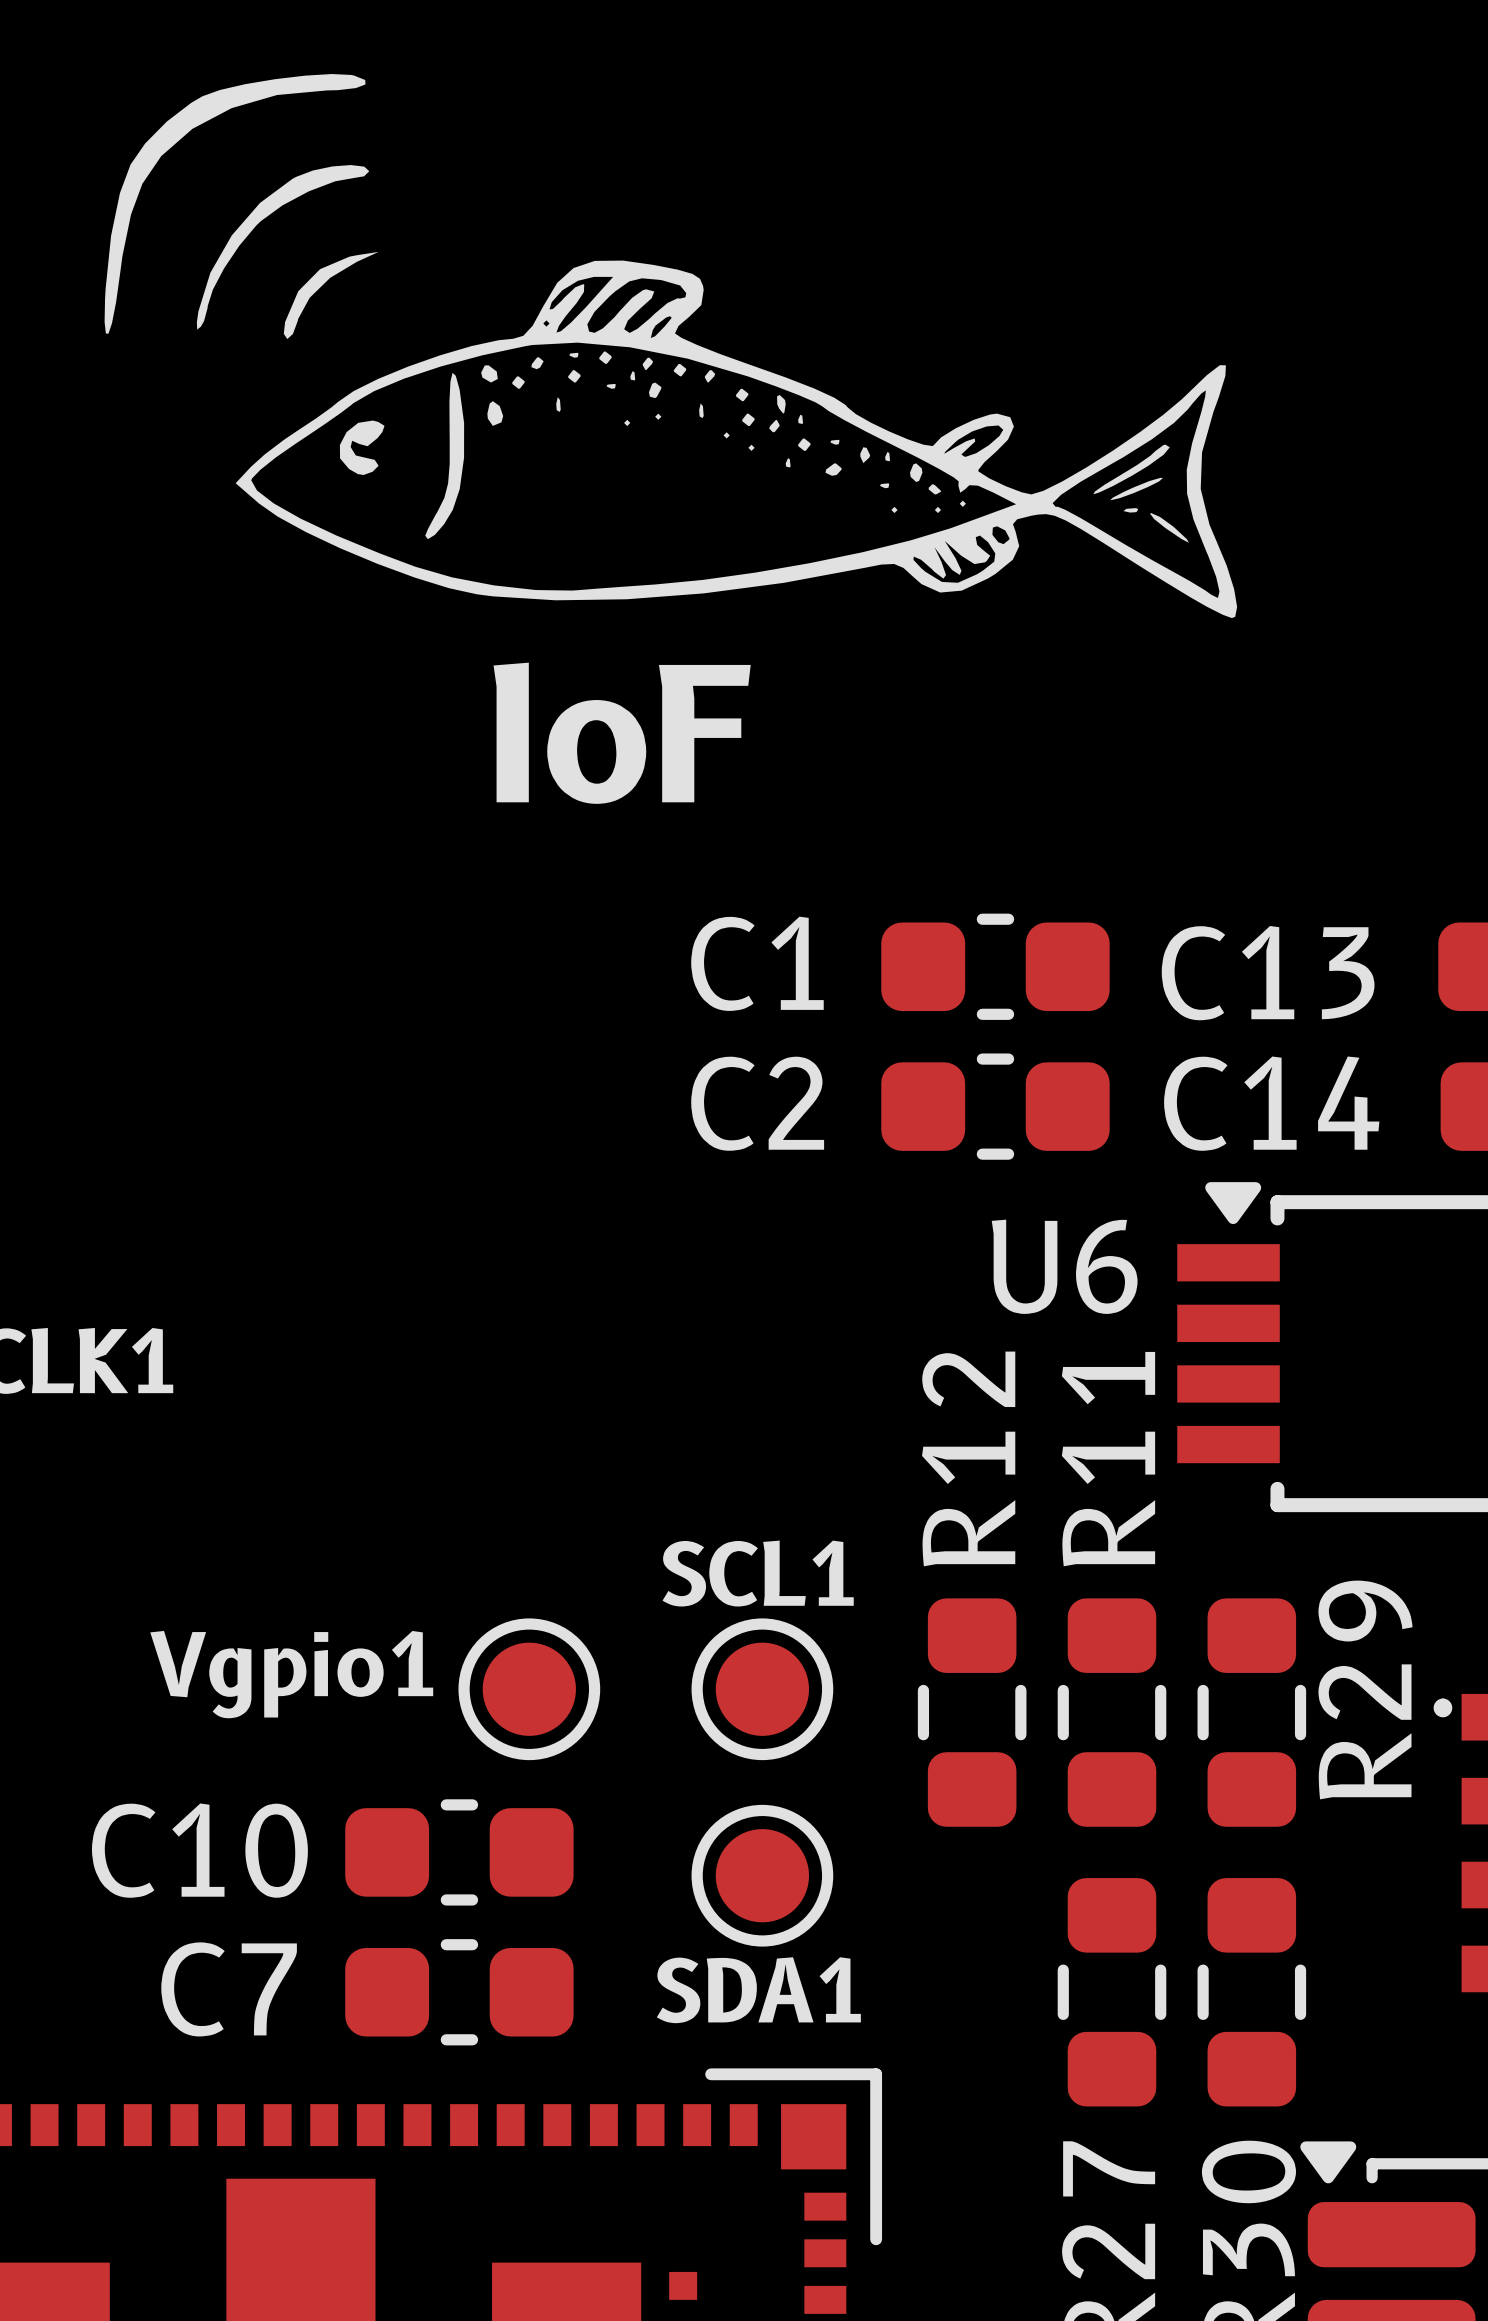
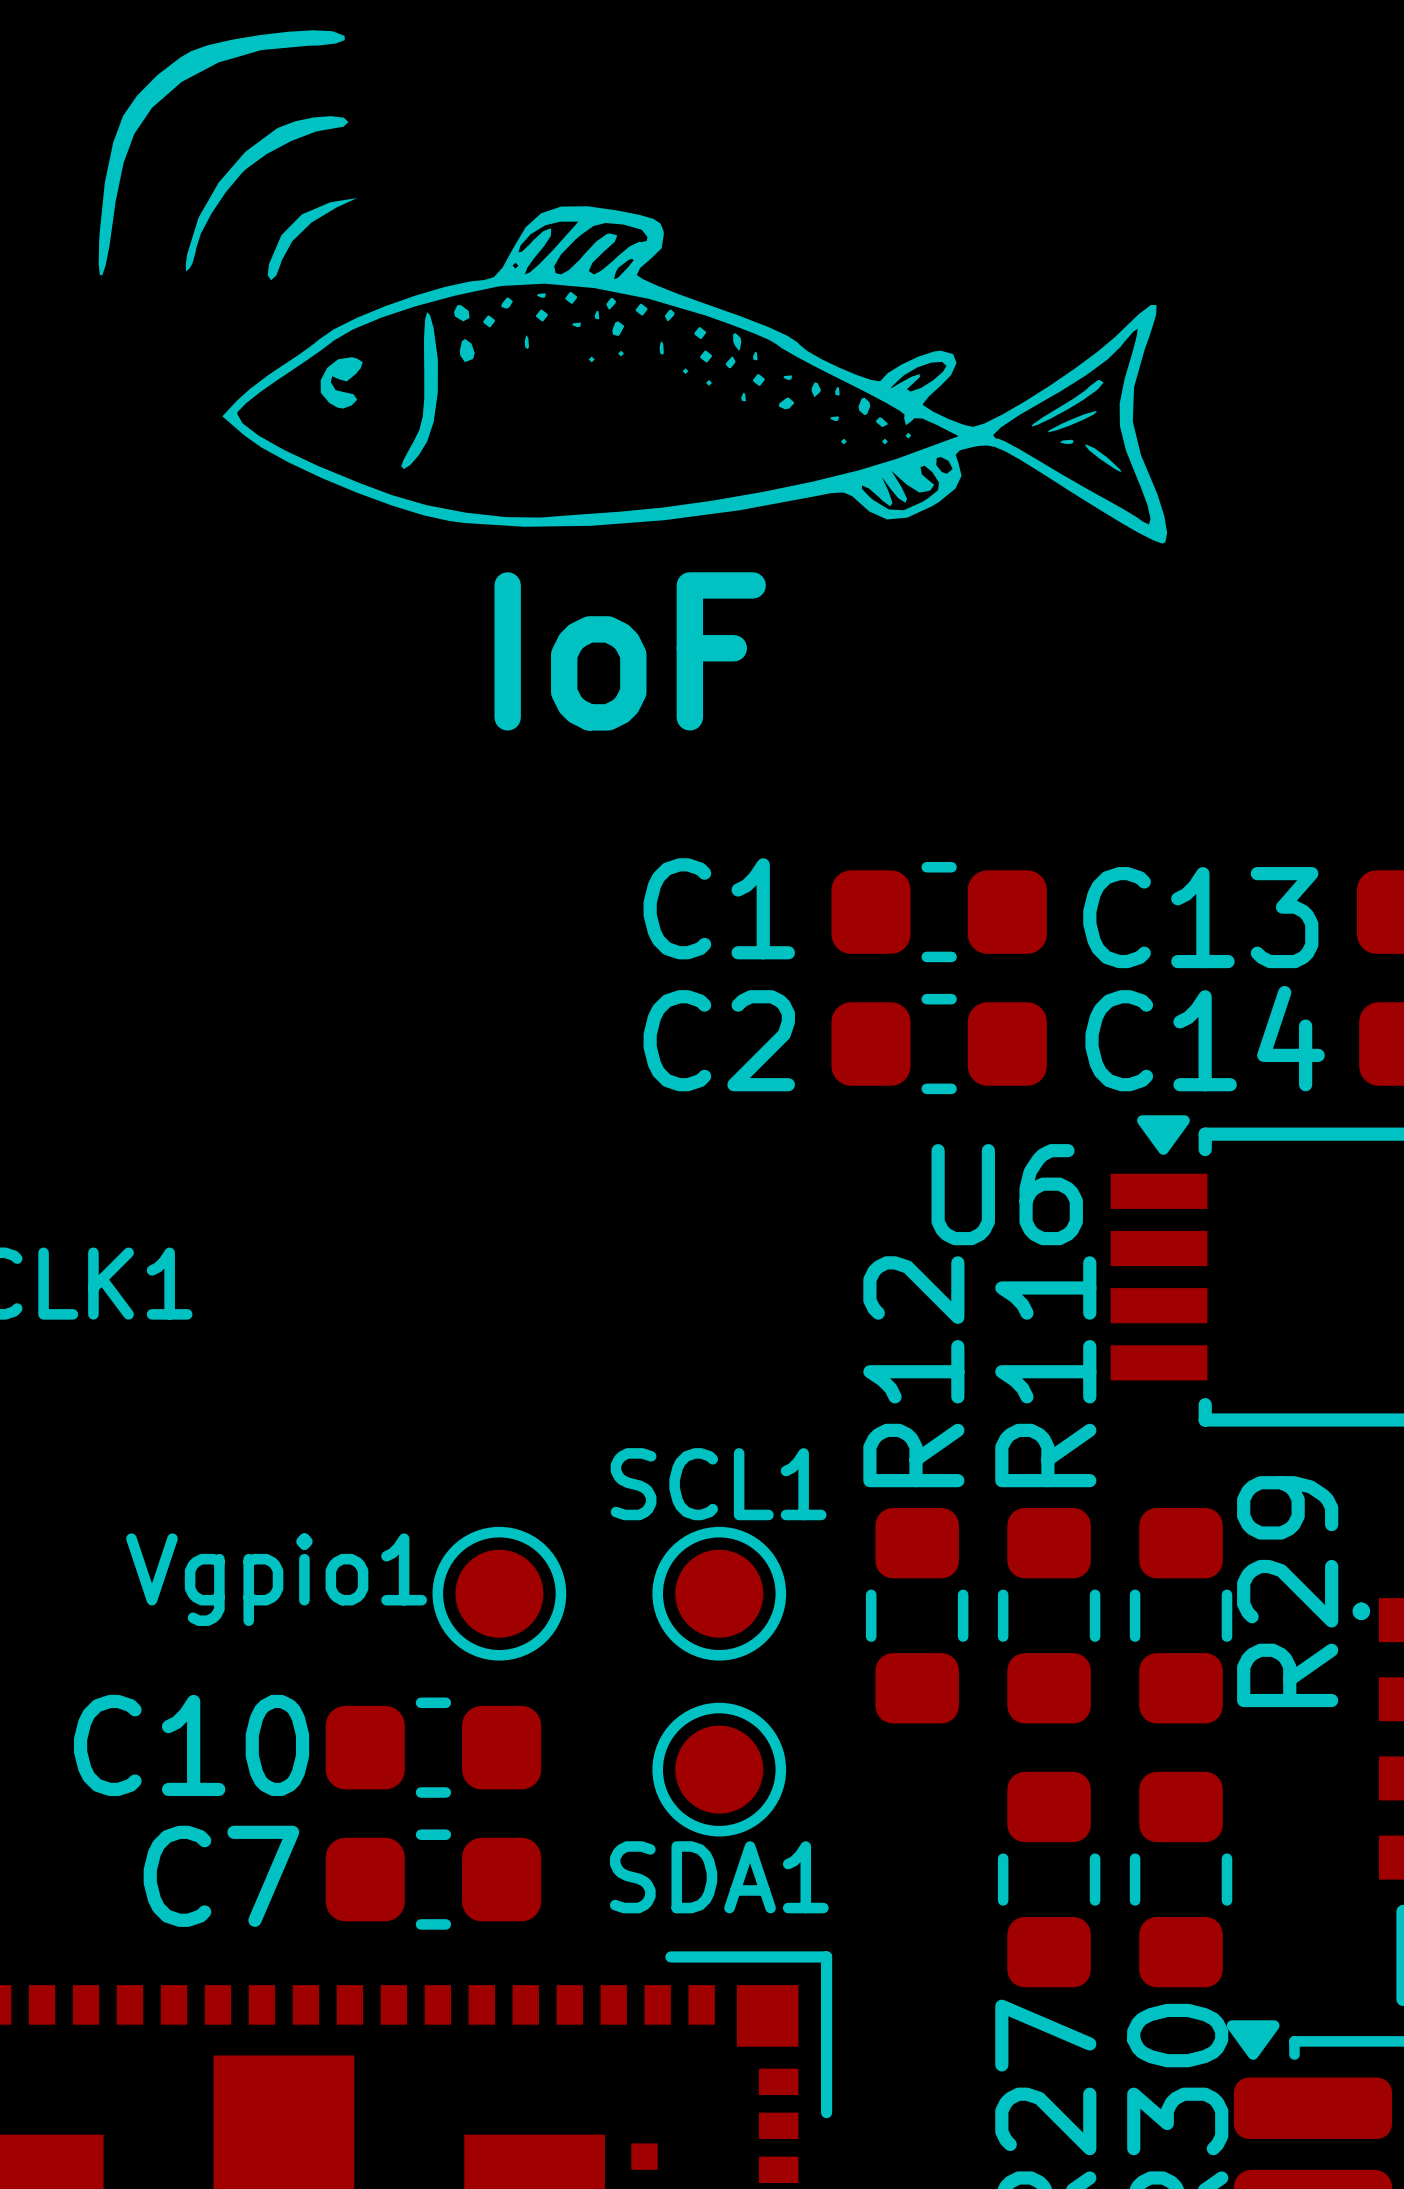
drawing position: (670, 346) -> (632, 286)
text position: IoF (622, 733) -> IoF (630, 651)

